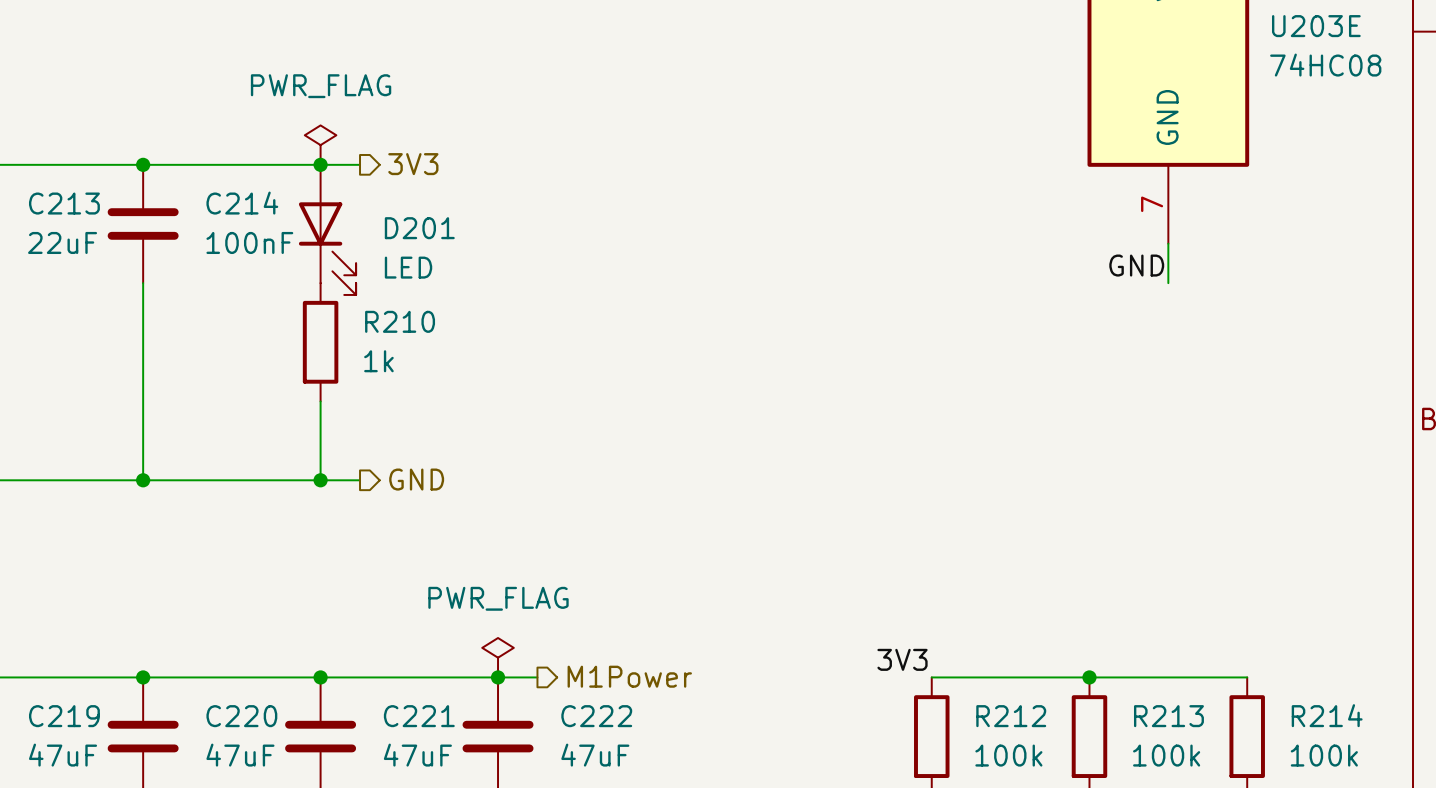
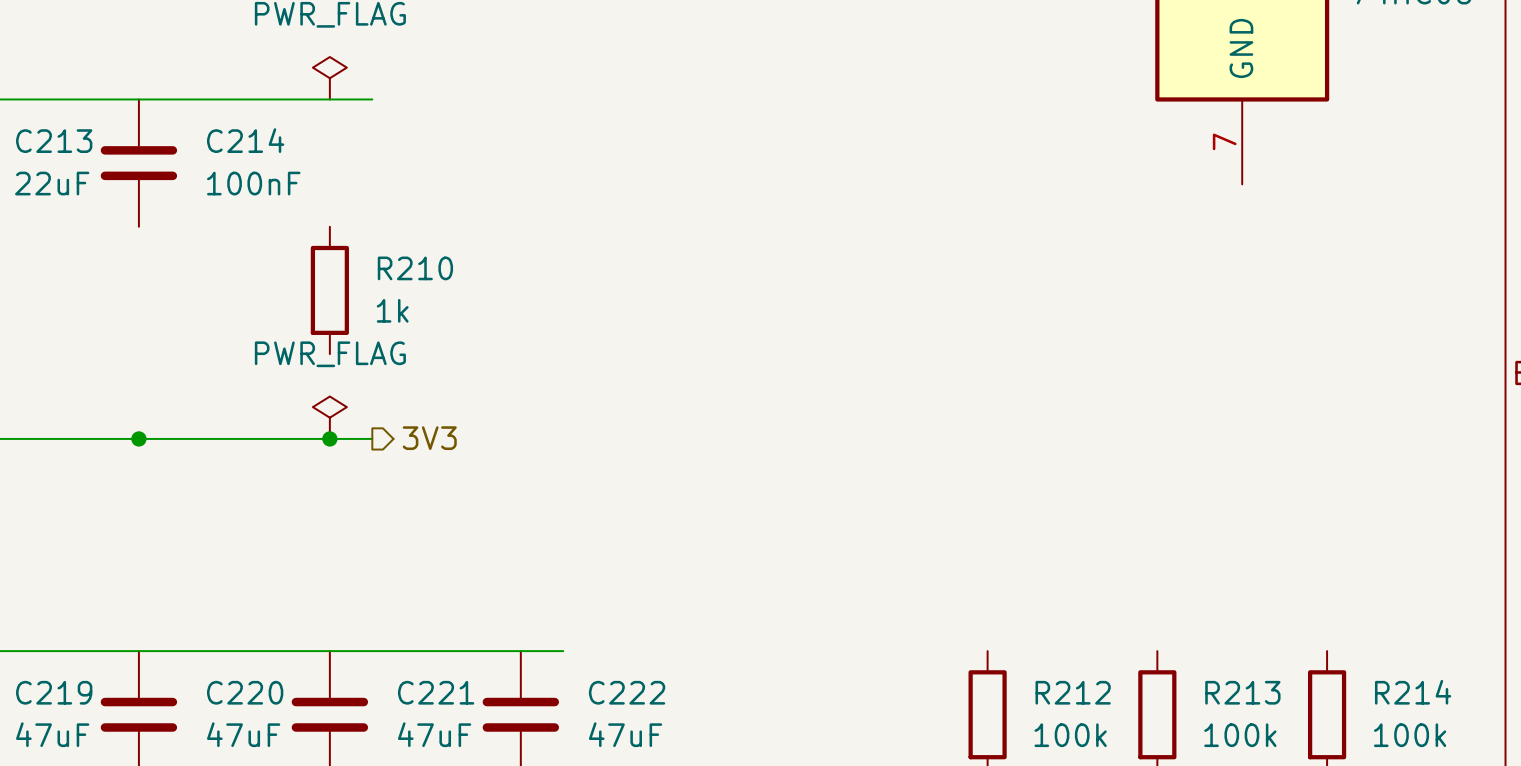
junction: (143, 164) -> none
junction: (320, 164) -> none
hierarchical label: 3V3 (413, 164) -> none
D201: LED (327, 229) -> none
wire: (1168, 243) (1168, 283) -> none
label: GND (1136, 265) -> none
wire: (143, 283) (143, 480) -> none
wire: (320, 401) (320, 480) -> none
power symbol: none -> PWR_FLAG (329, 417)
hierarchical label: GND (416, 479) -> 3V3 (429, 438)
power symbol: PWR_FLAG (498, 657) -> none
label: 3V3 (902, 659) -> none
hierarchical label: M1Power (629, 676) -> none
junction: (143, 677) -> none
junction: (320, 677) -> none
junction: (498, 677) -> none
wire: (931, 677) (1247, 677) -> none
junction: (1089, 677) -> none

